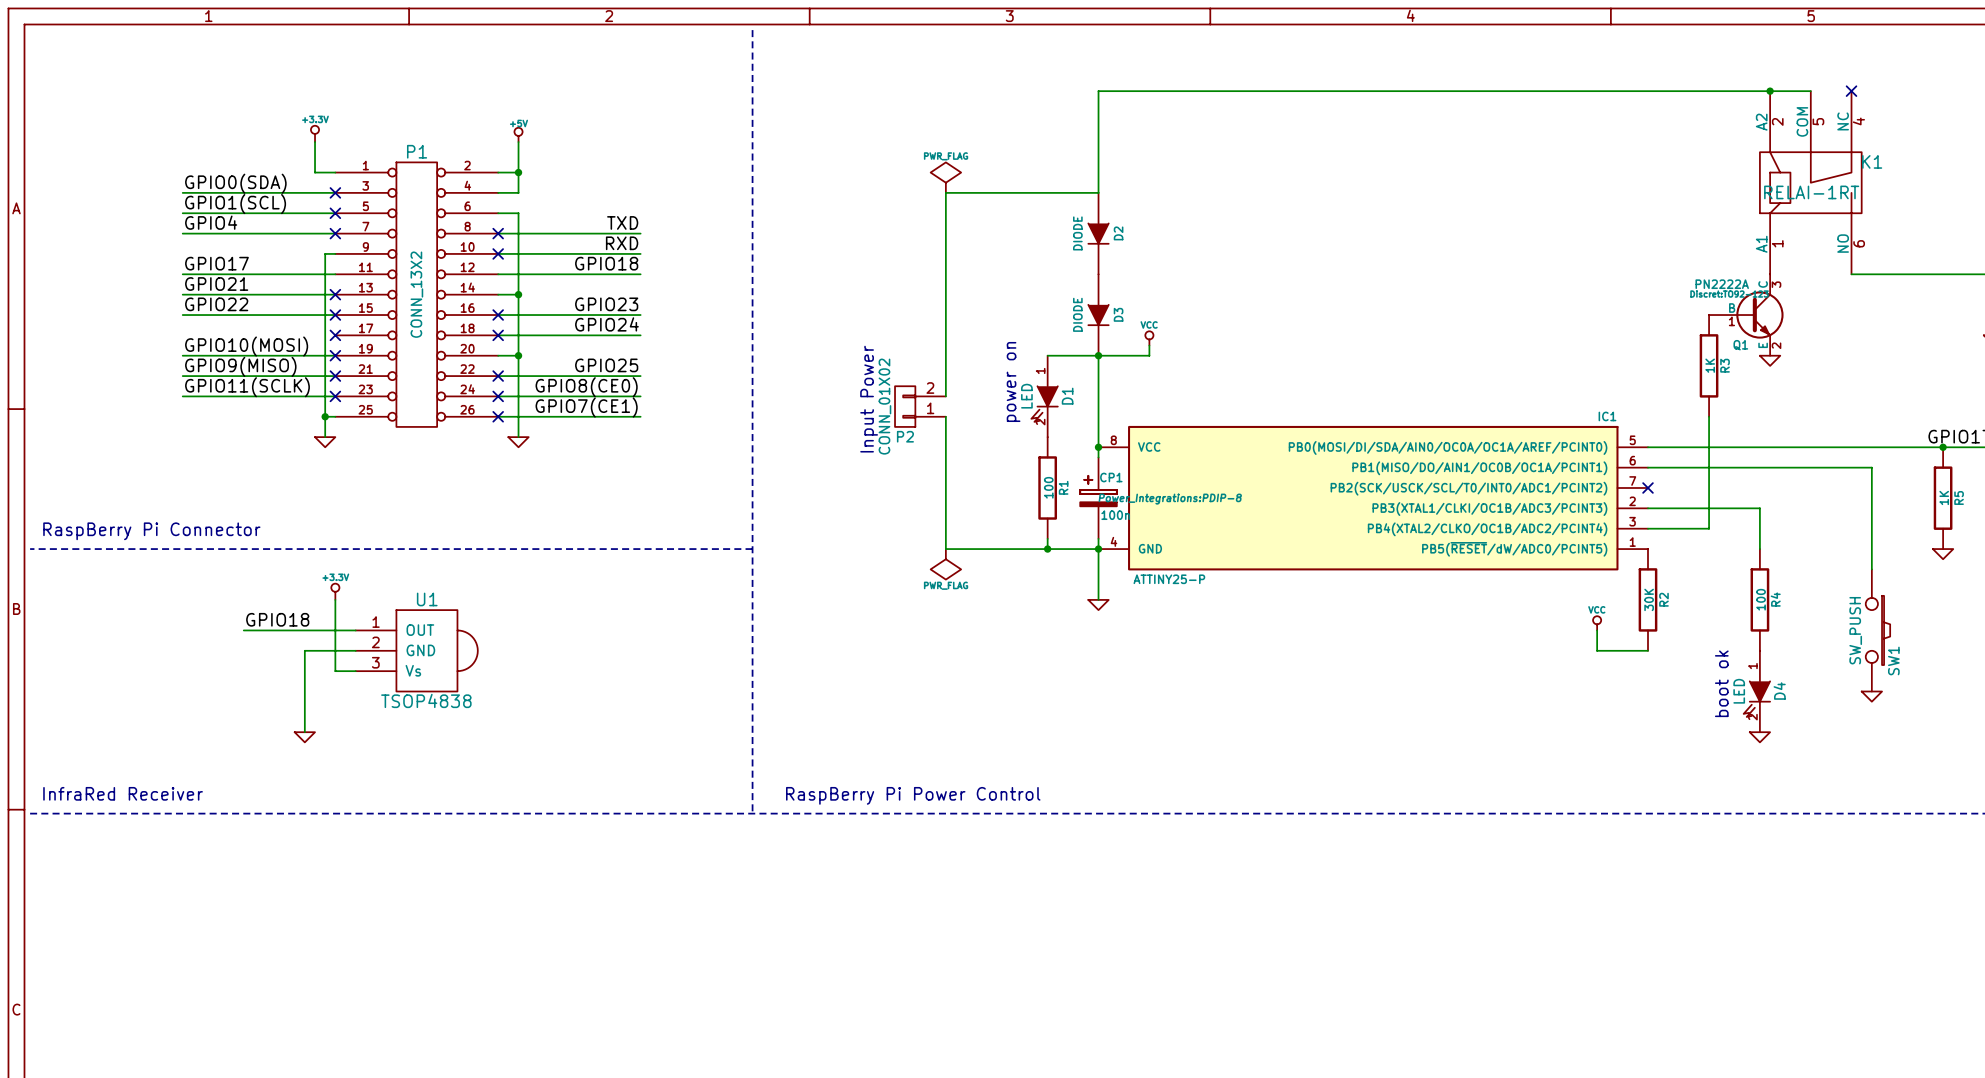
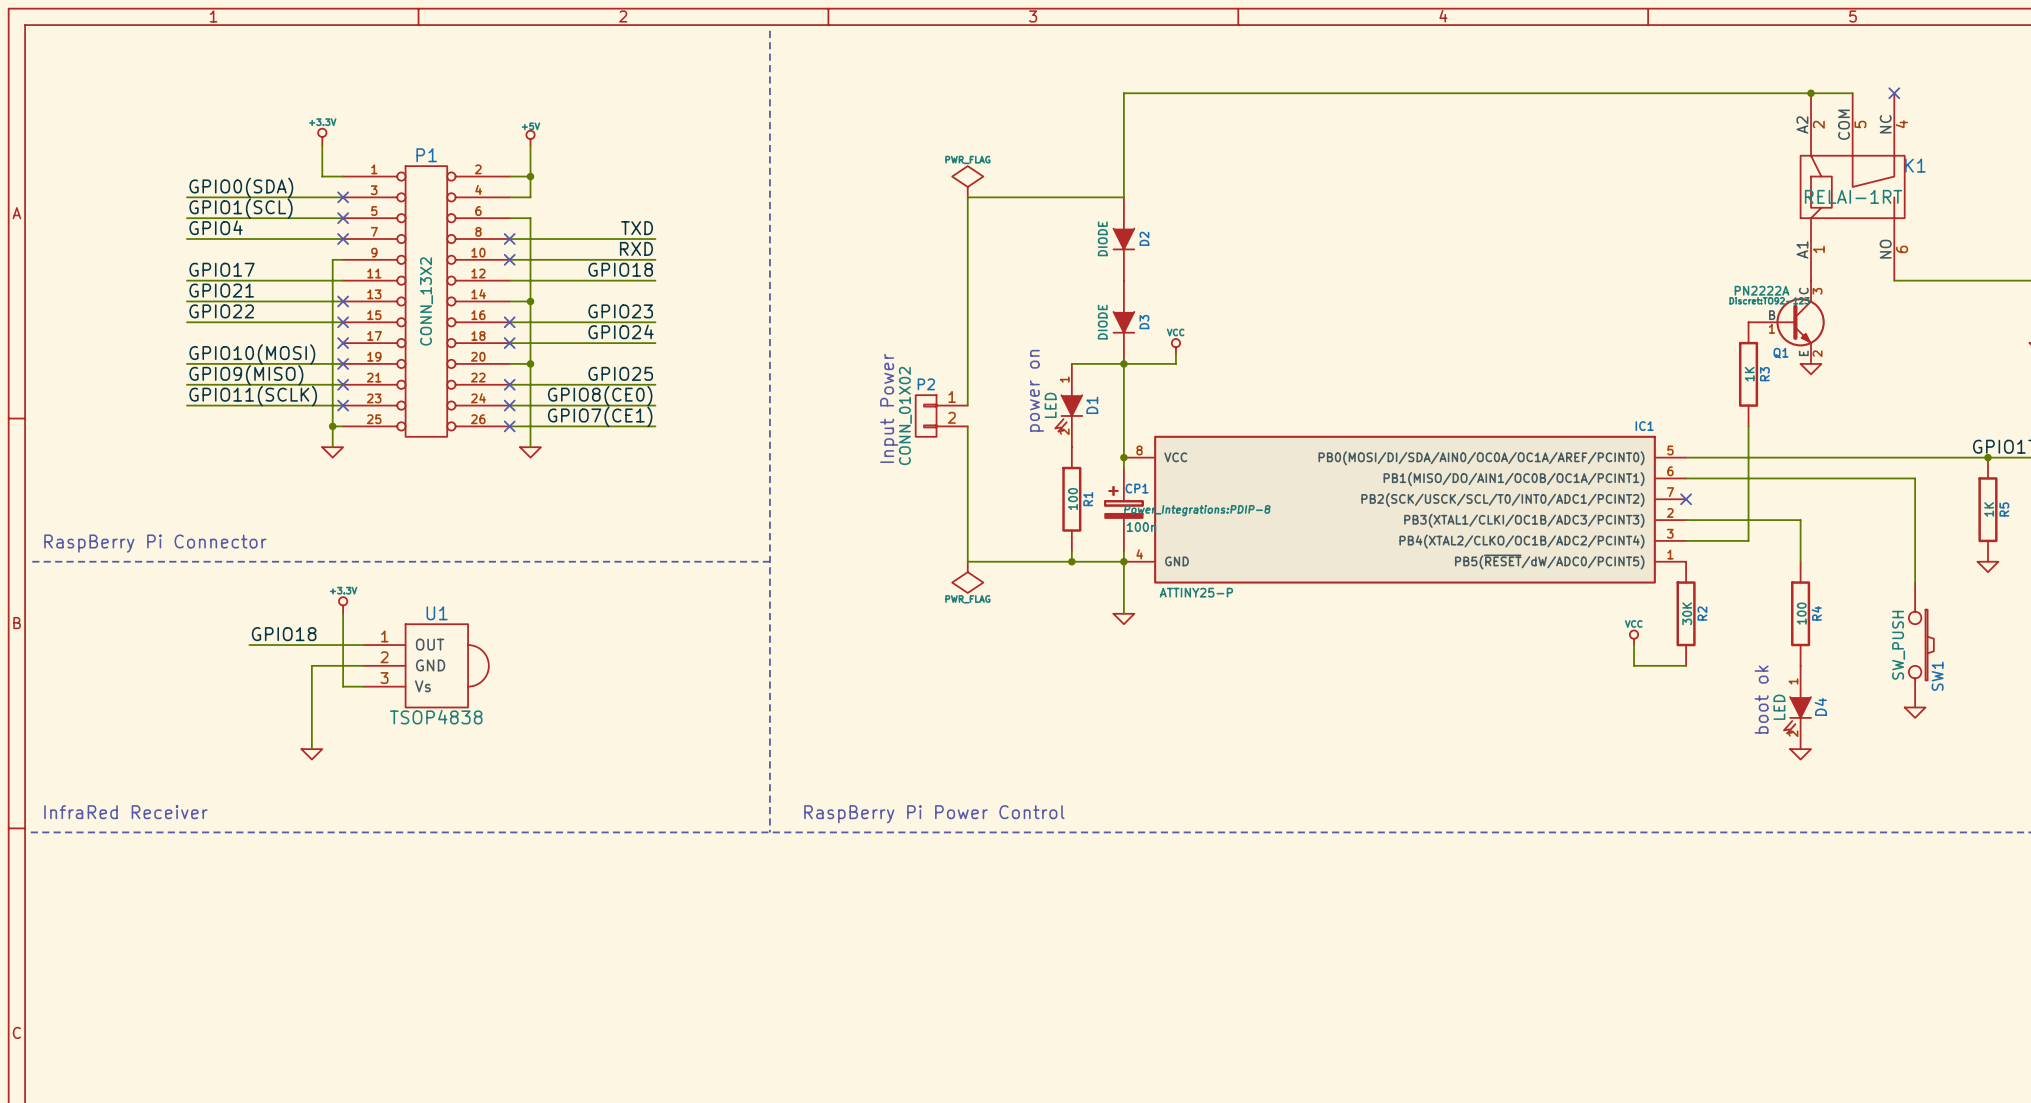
P2 flip: as is (905, 406) -> up-down (926, 415)

